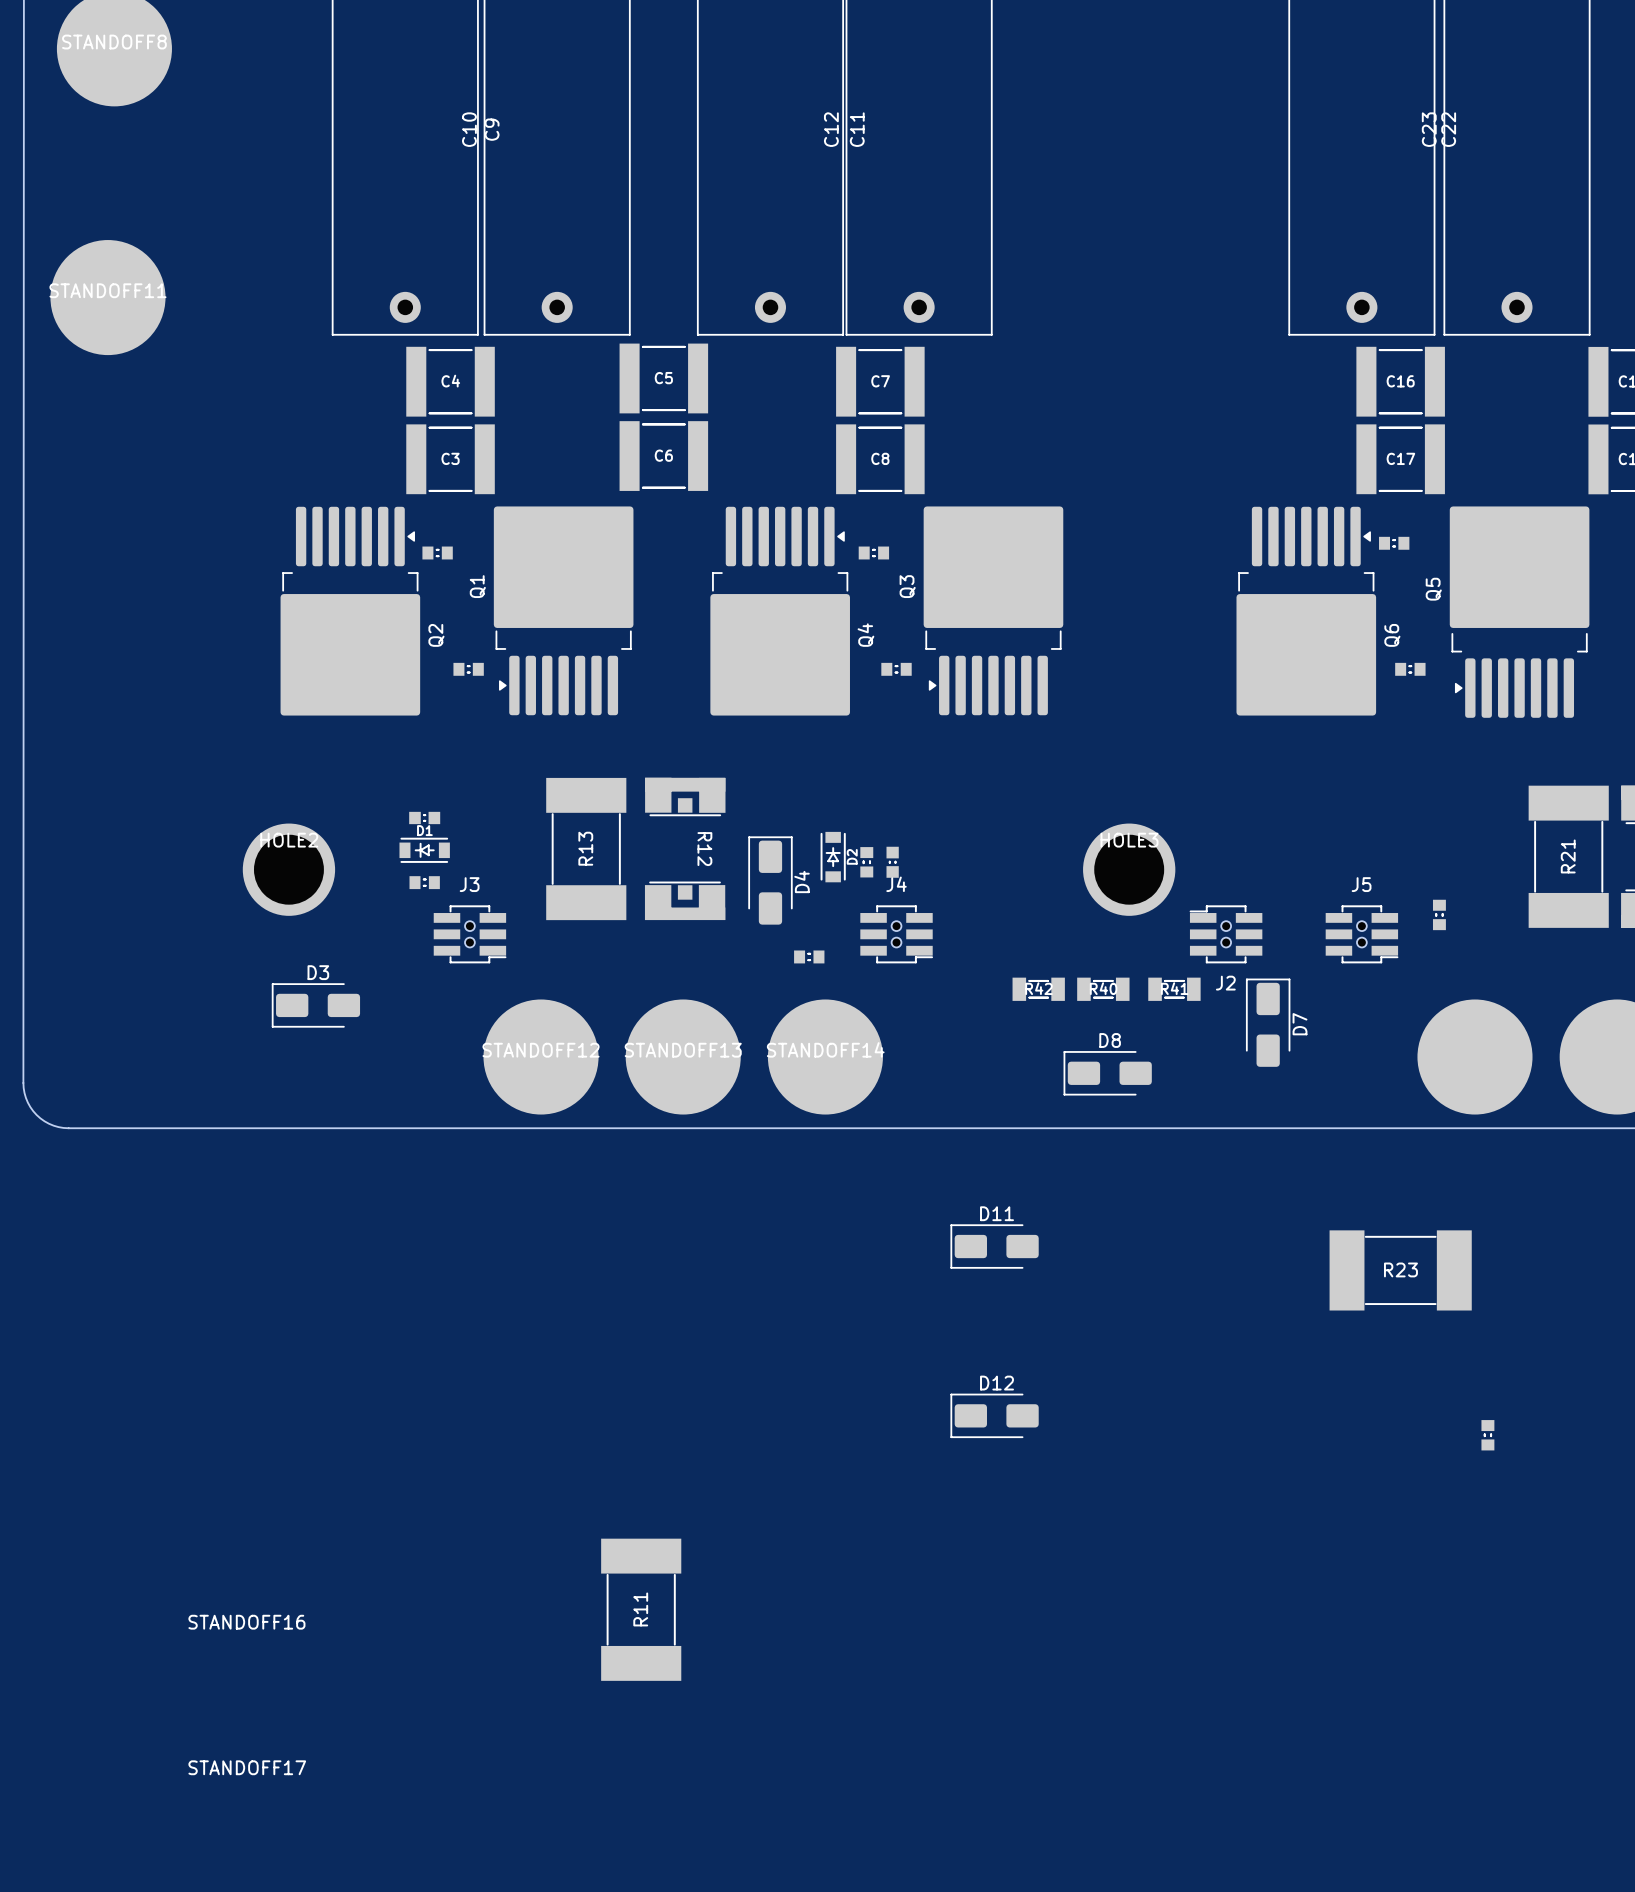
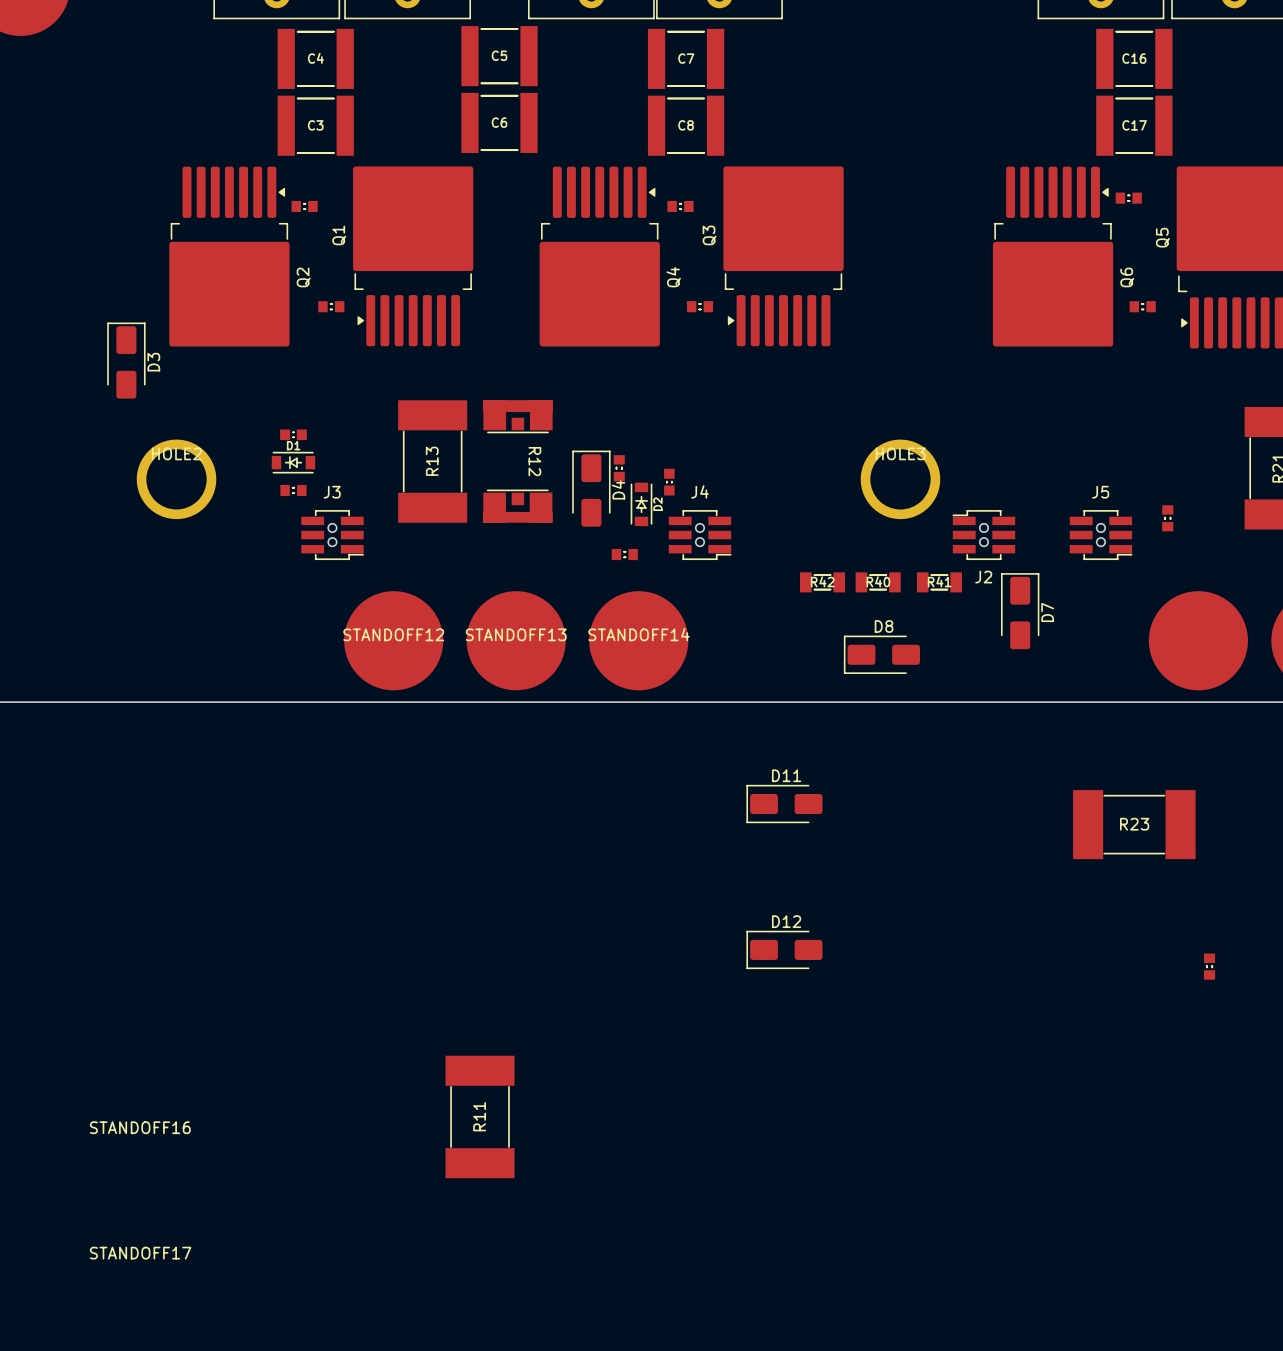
part footprint: [860, 847, 874, 878] -> [664, 468, 675, 496]
part: none -> (619, 468)
D2 position: (833, 857) -> (641, 504)
part: (892, 862) -> none
D3 rotation: 0° (315, 1005) -> 90° clockwise (126, 360)
D3 position: (315, 1005) -> (126, 360)

